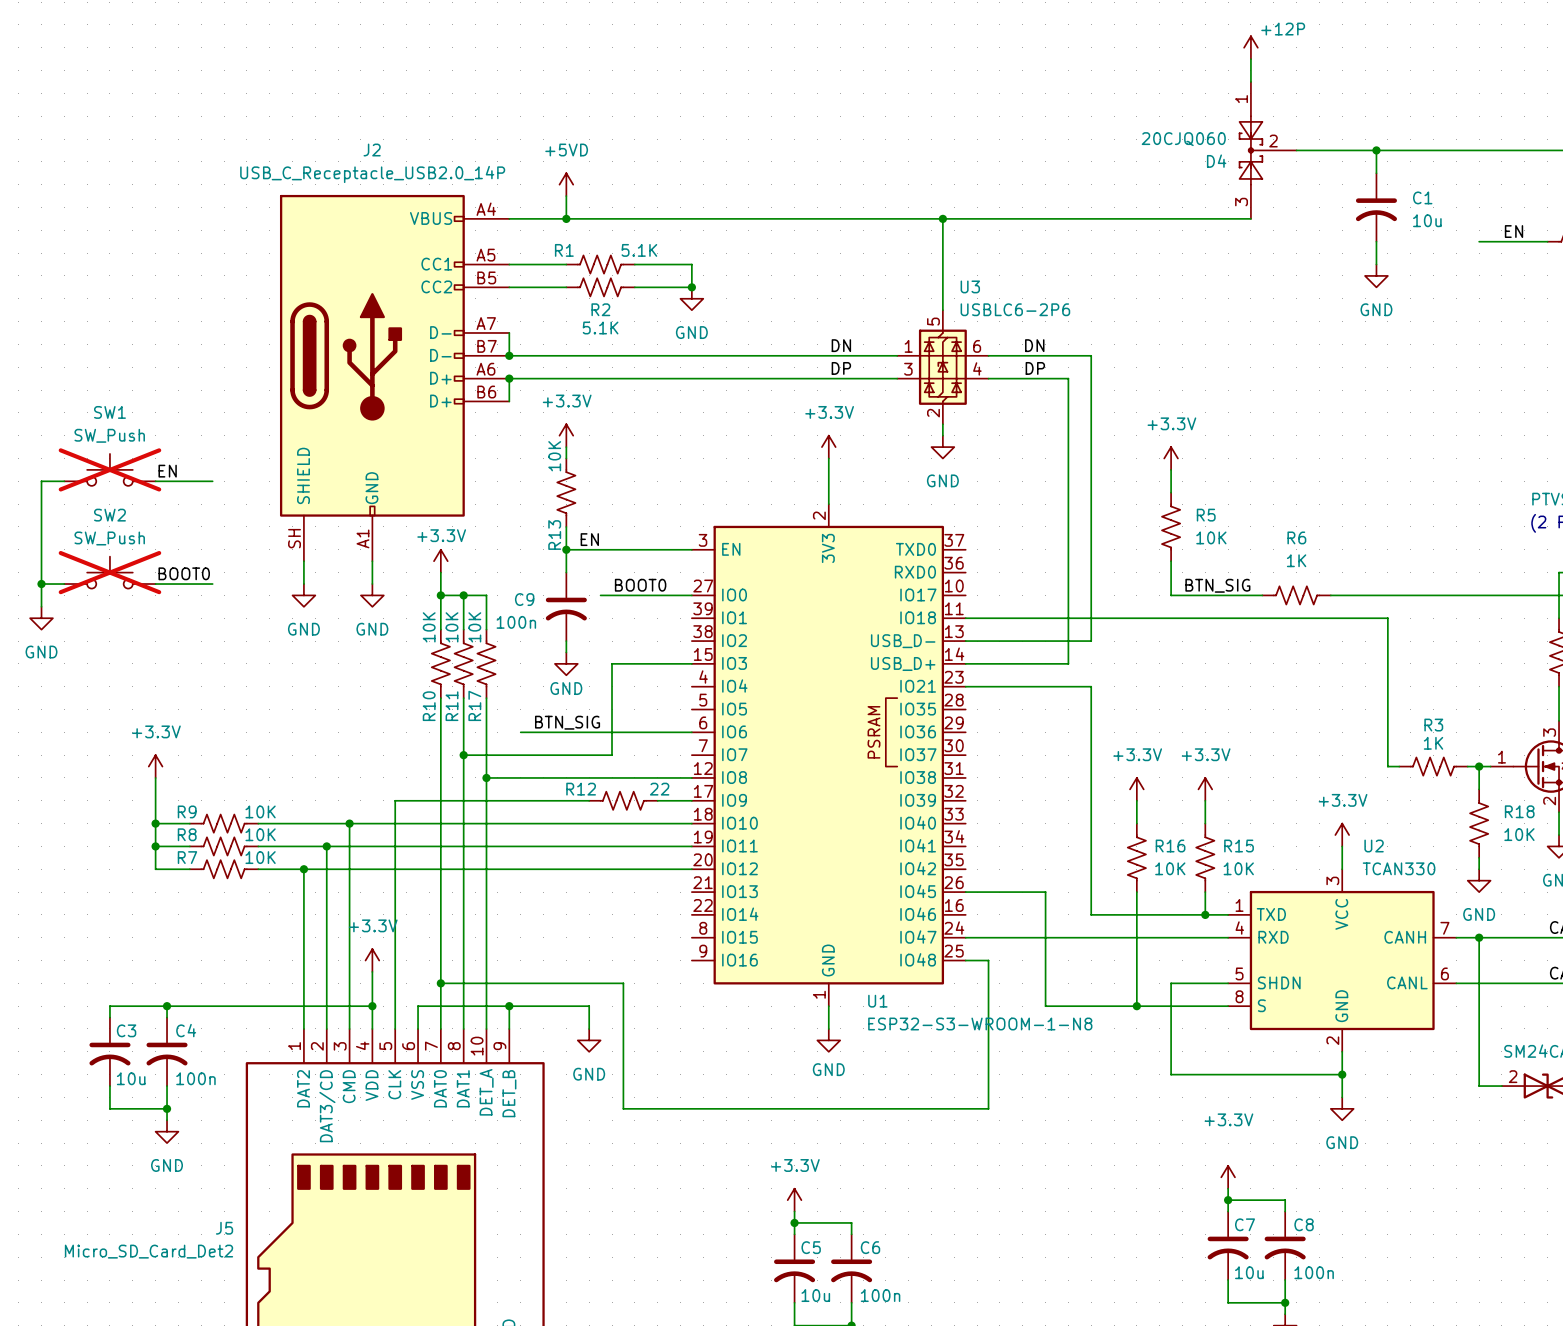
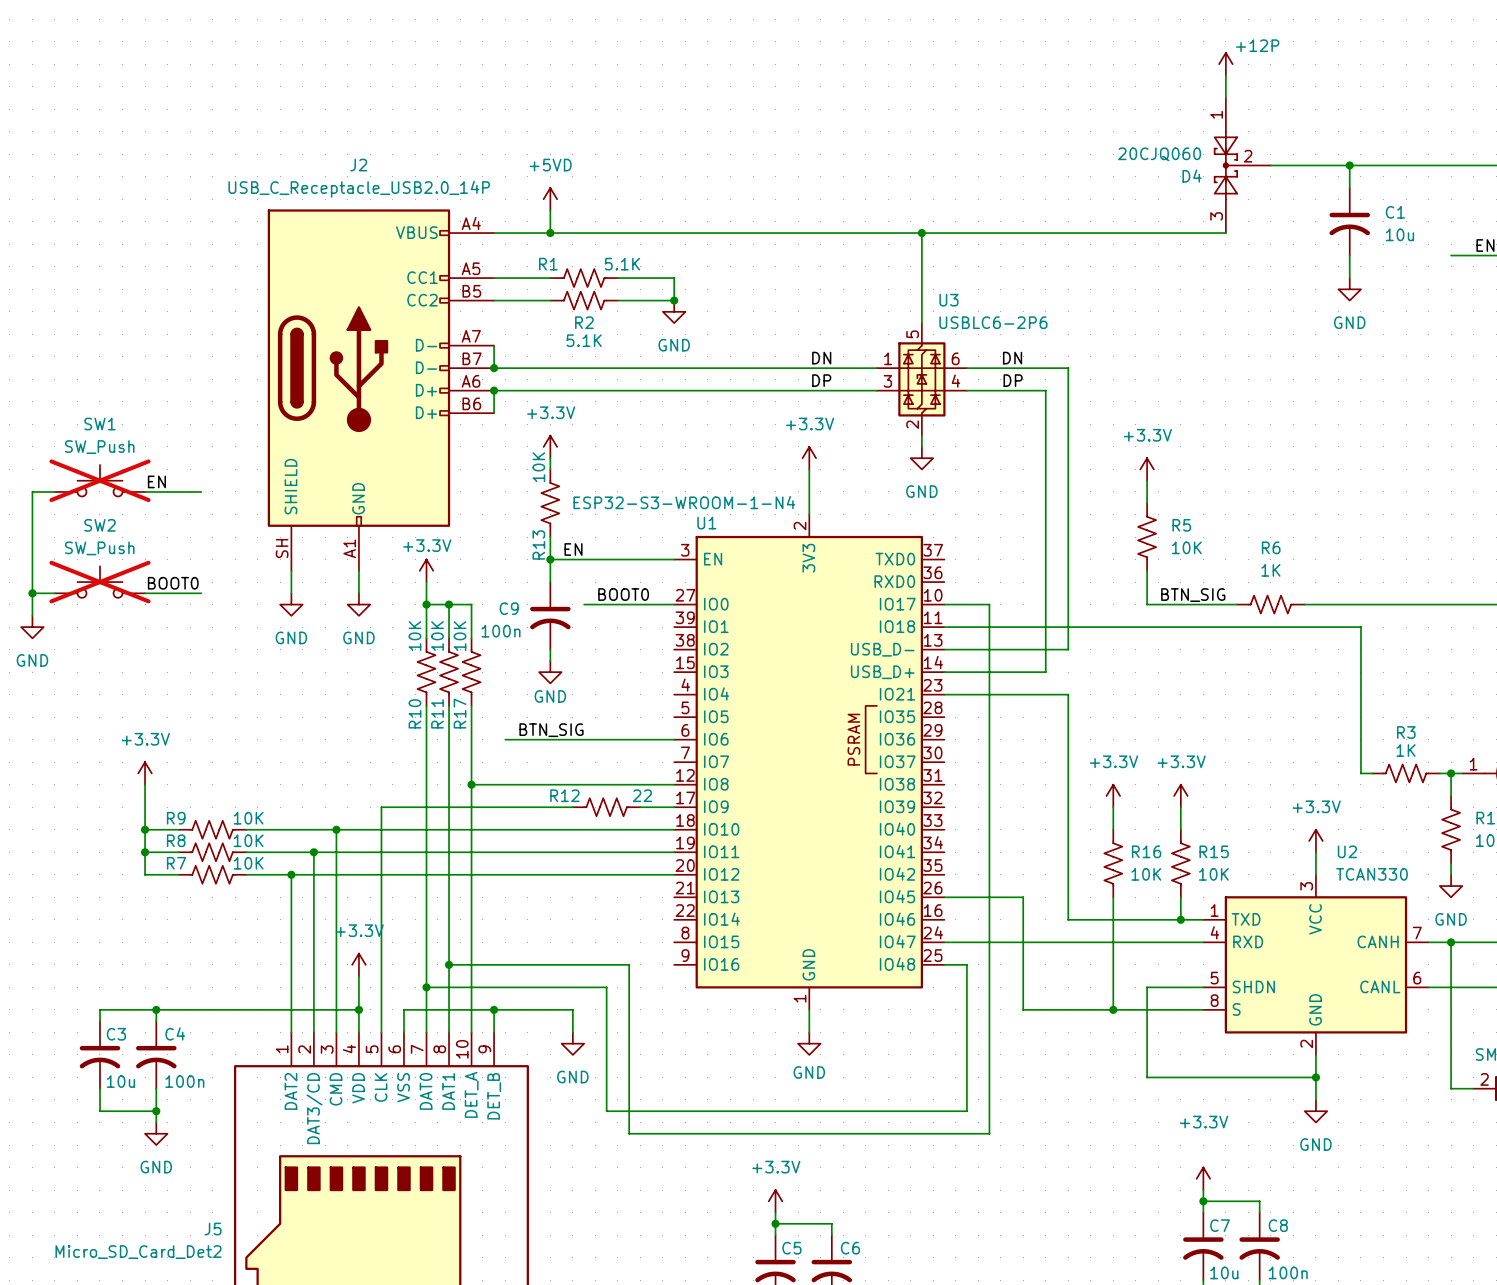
wire: none -> (944, 604) (989, 604) (989, 1133) (629, 1133) (629, 964) (449, 964)
wire: (691, 663) (612, 663) (612, 755) (463, 755) -> none
junction: (463, 755) -> none
junction: none -> (449, 964)
U1 name position: U1 (877, 1001) -> U1 (706, 523)
U1 value: ESP32-S3-WROOM-1-N8 (980, 1024) -> ESP32-S3-WROOM-1-N4 (684, 502)

